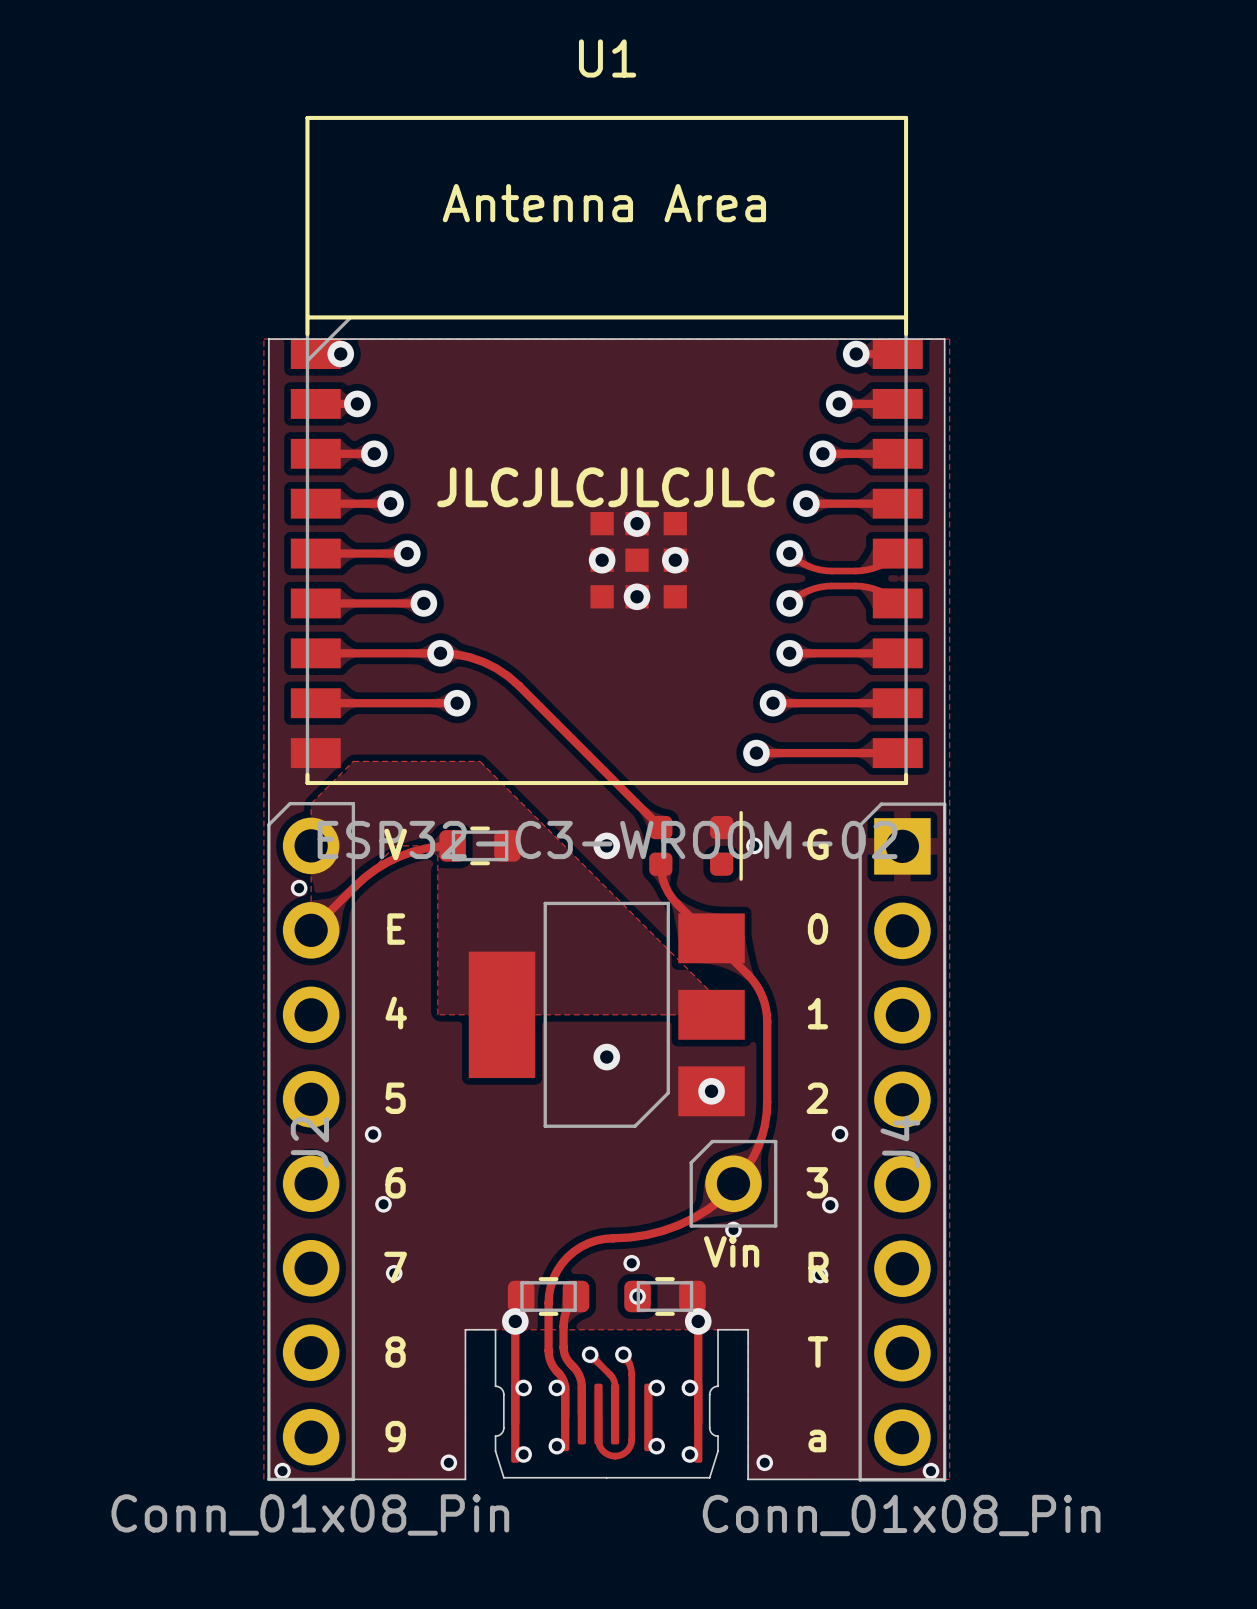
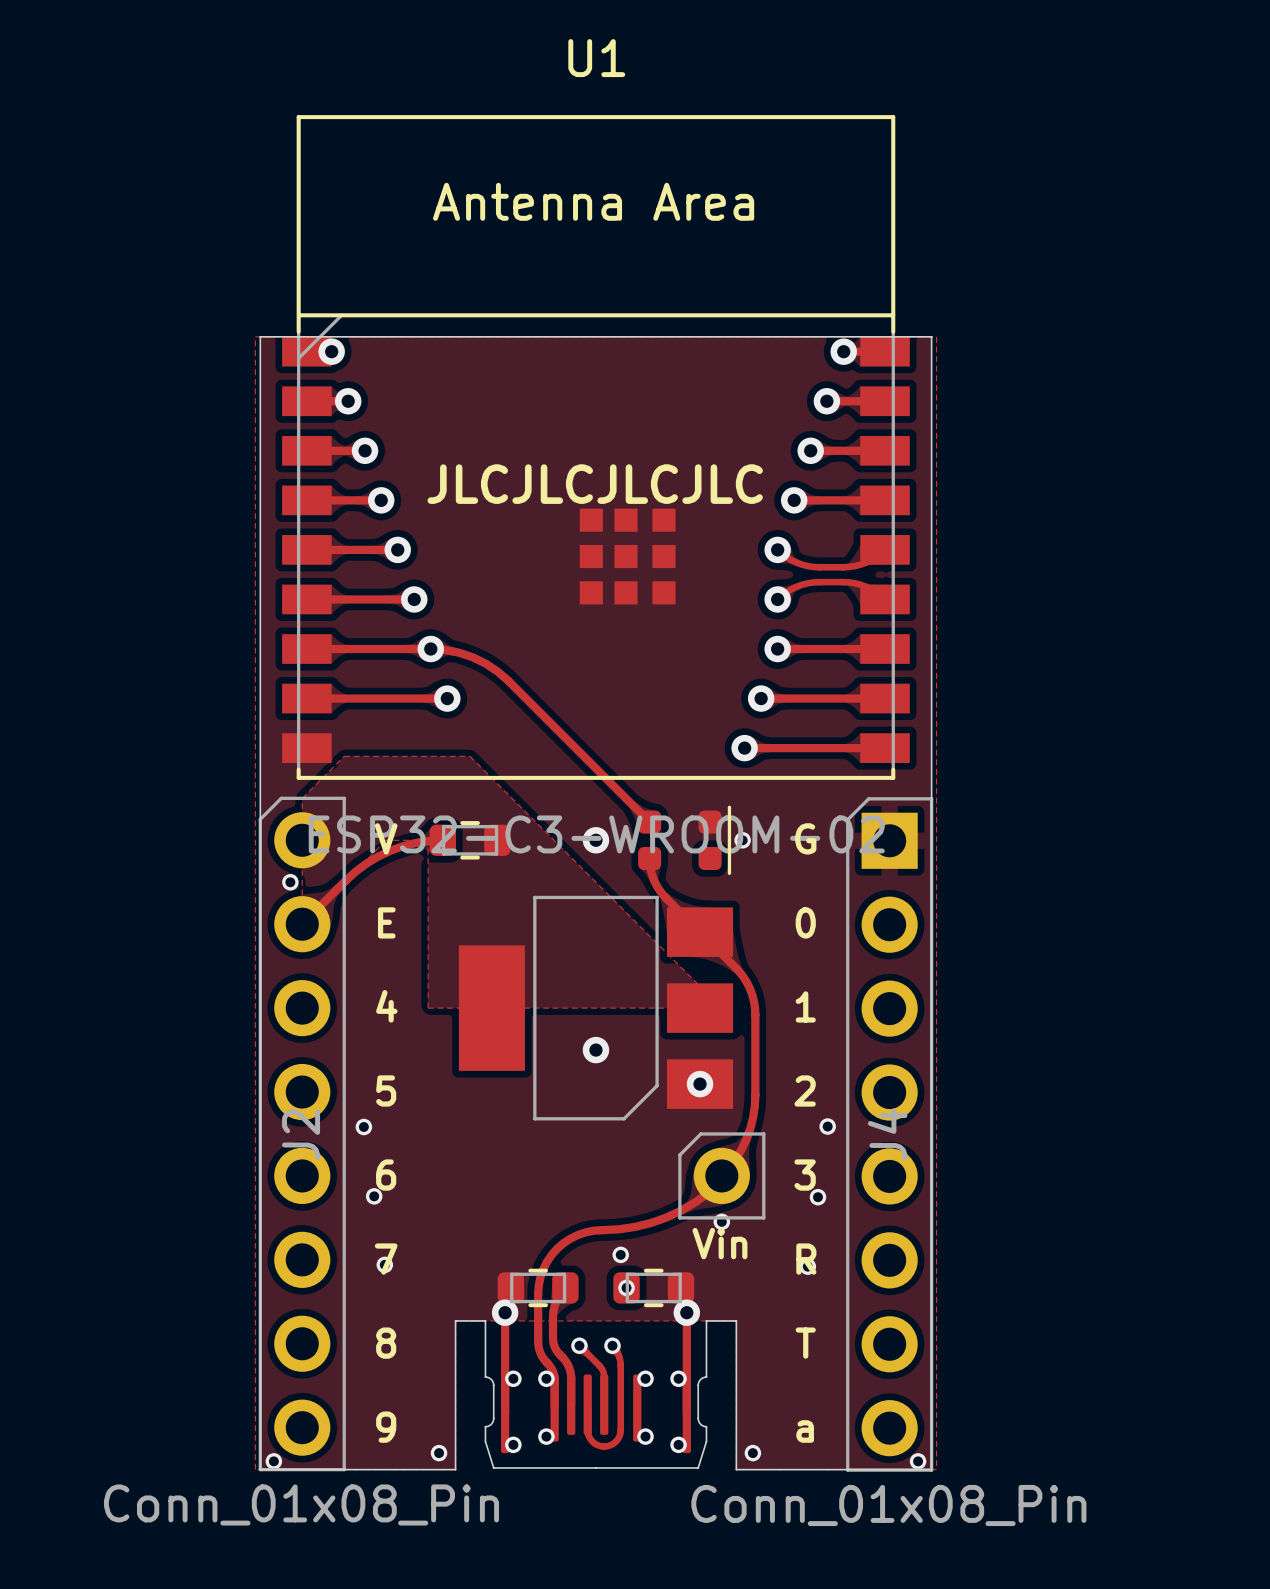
via: (637, 523) -> none
via: (602, 560) -> none
via: (675, 560) -> none
via: (637, 596) -> none

